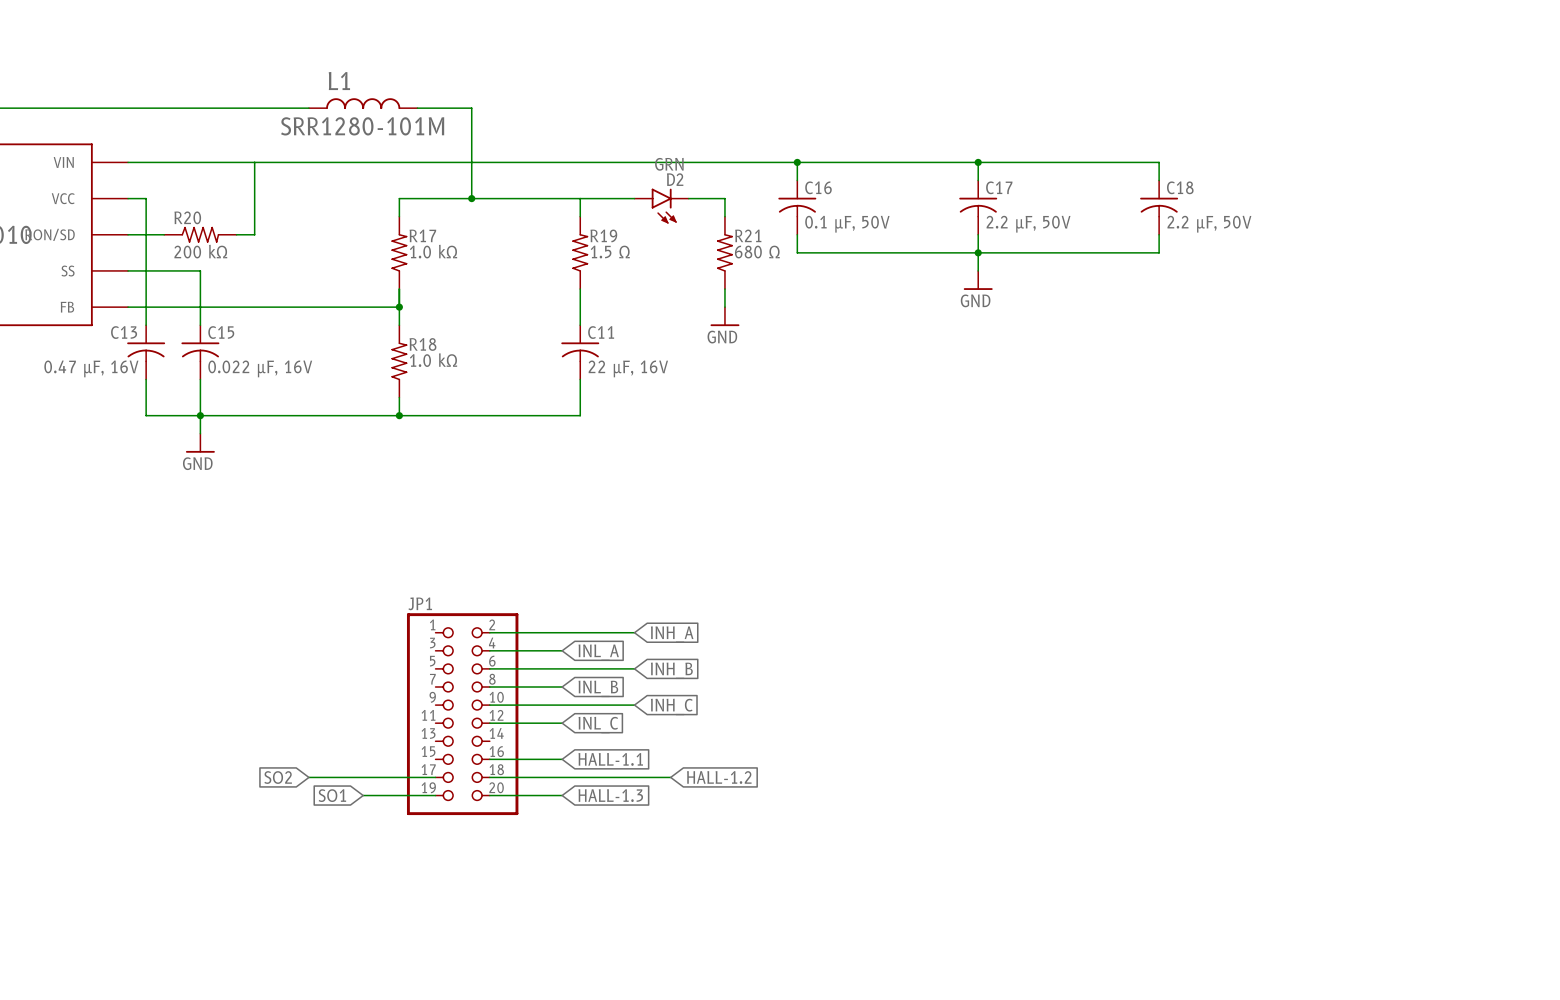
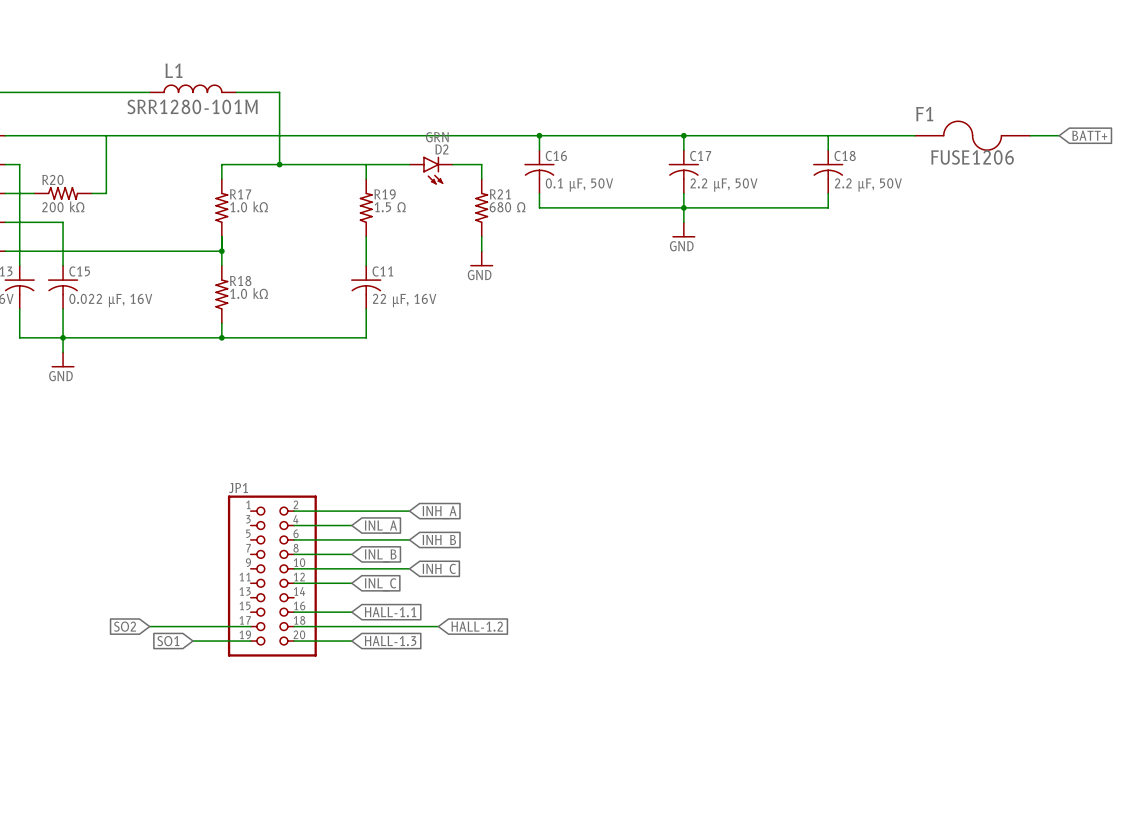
wire: none -> (828, 135) (914, 135)
F1: none -> FUSE1206 (972, 135)
wire: none -> (1030, 135) (1059, 135)
global label: none -> BATT+ (1089, 135)

